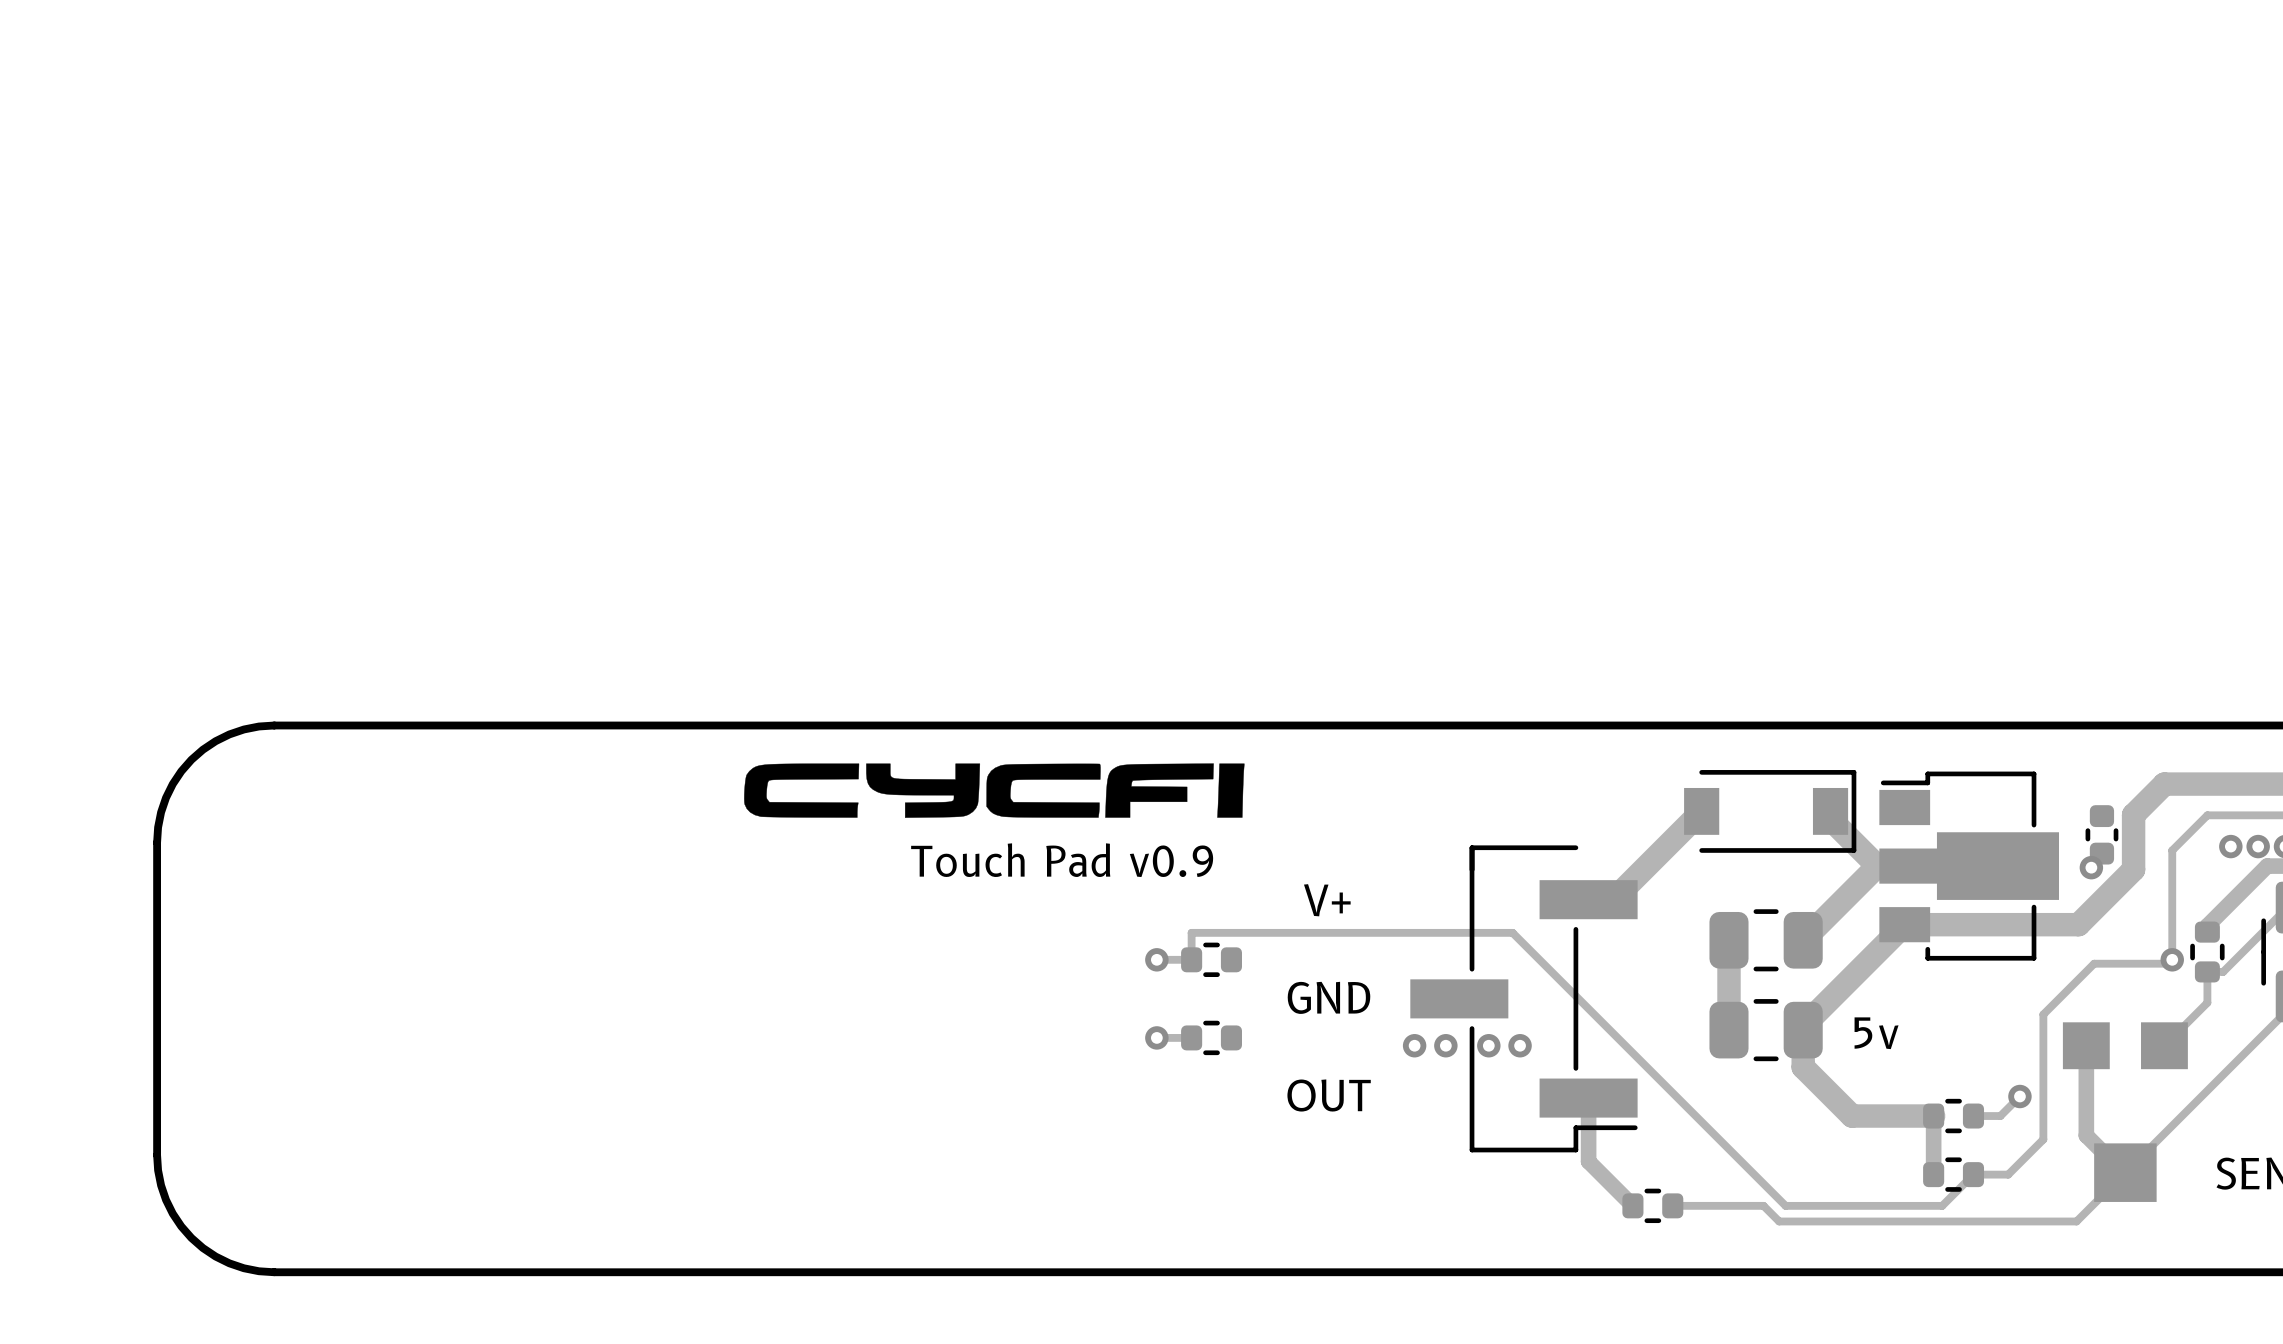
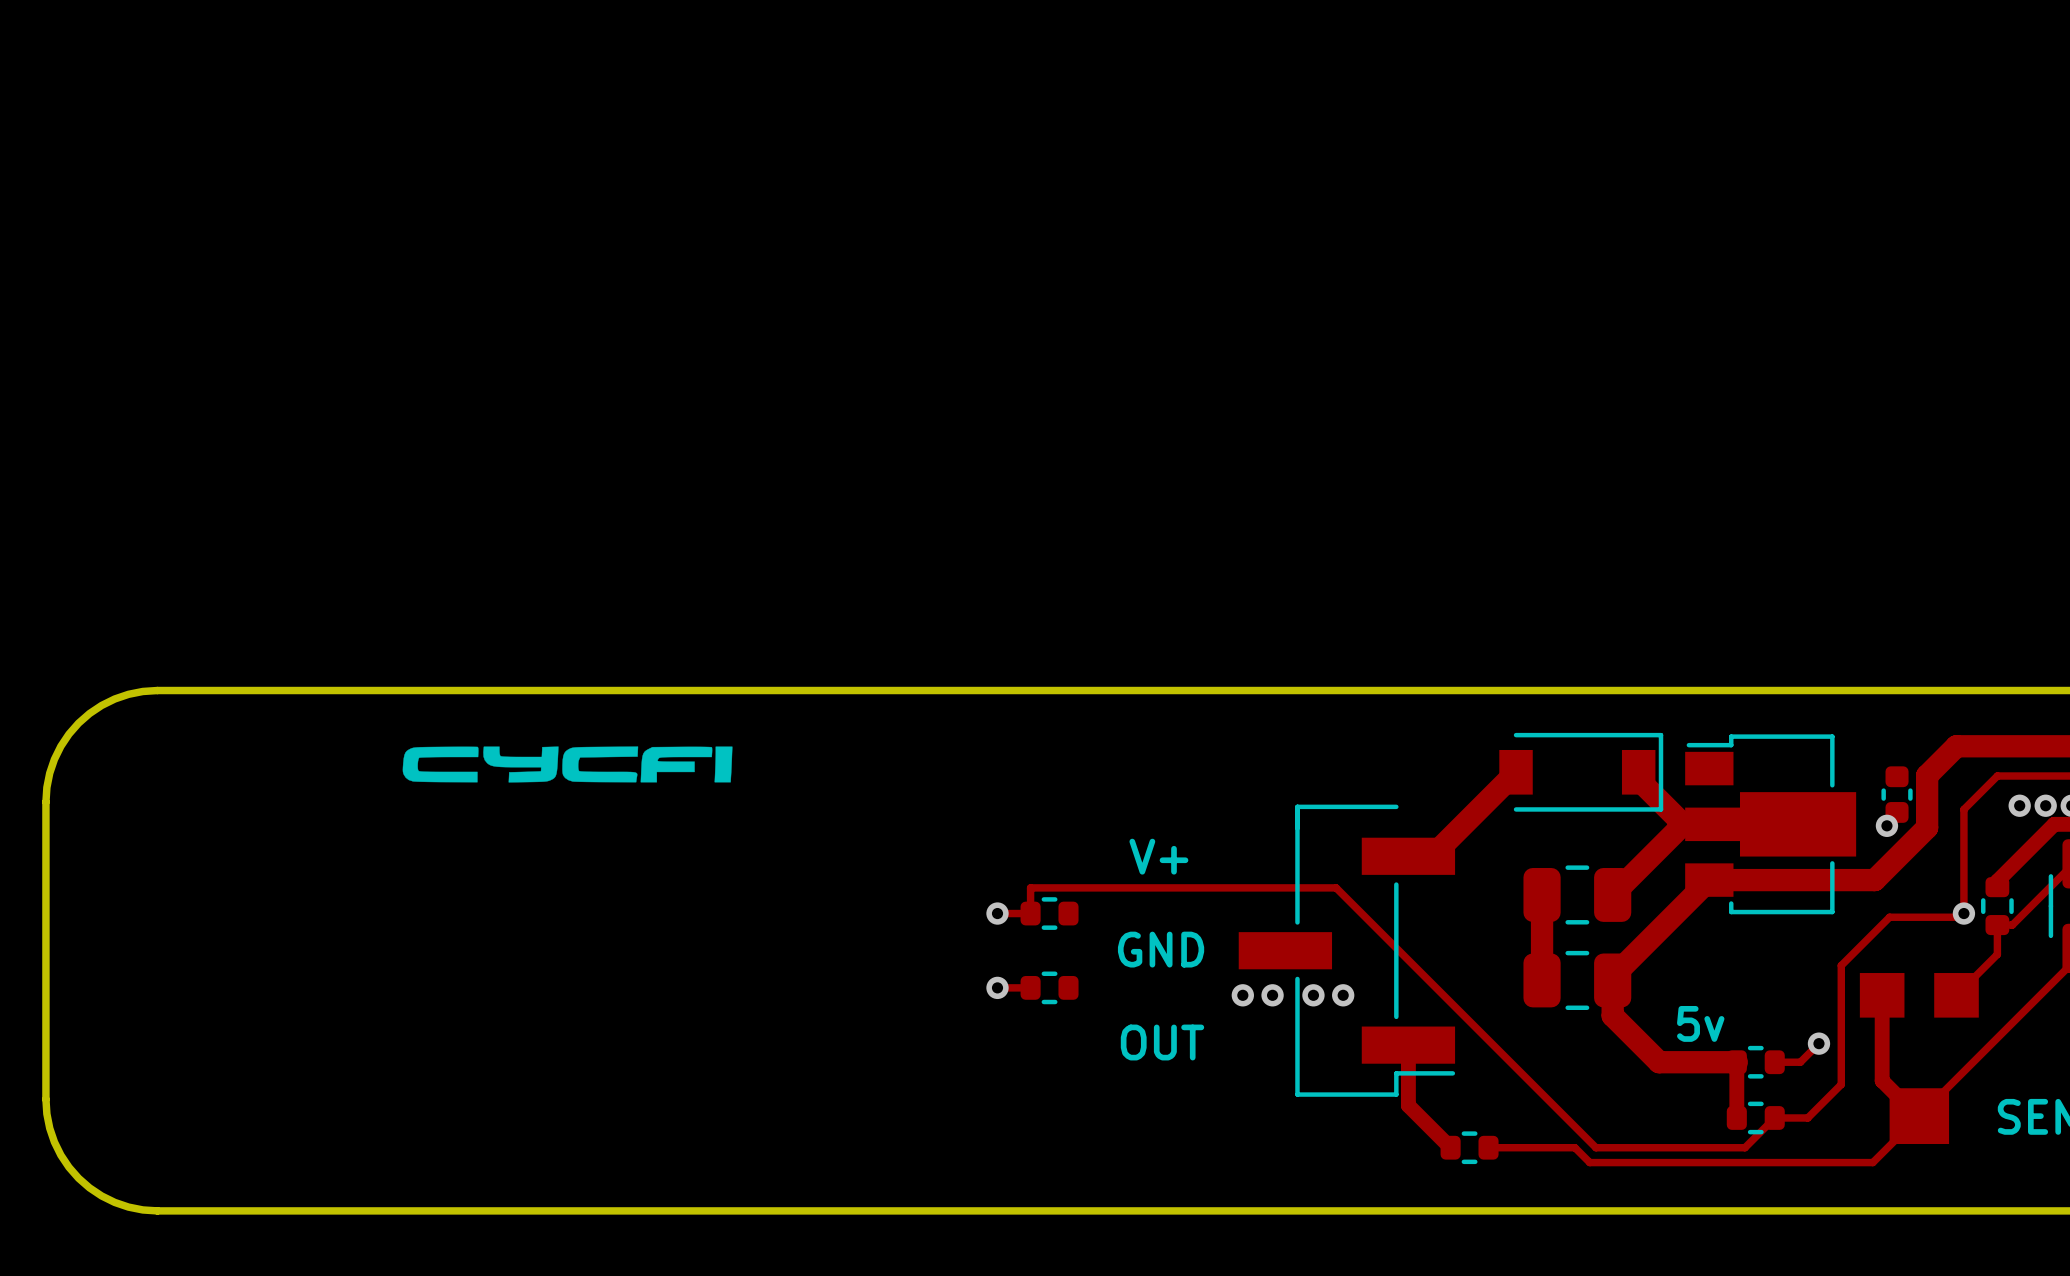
drawing: [744, 763, 1245, 818] -> none
drawing: none -> [402, 746, 733, 783]
text: Touch Pad v0.9 (1062, 860) -> none
text position: 5v (1876, 1033) -> 5v (1700, 1023)

